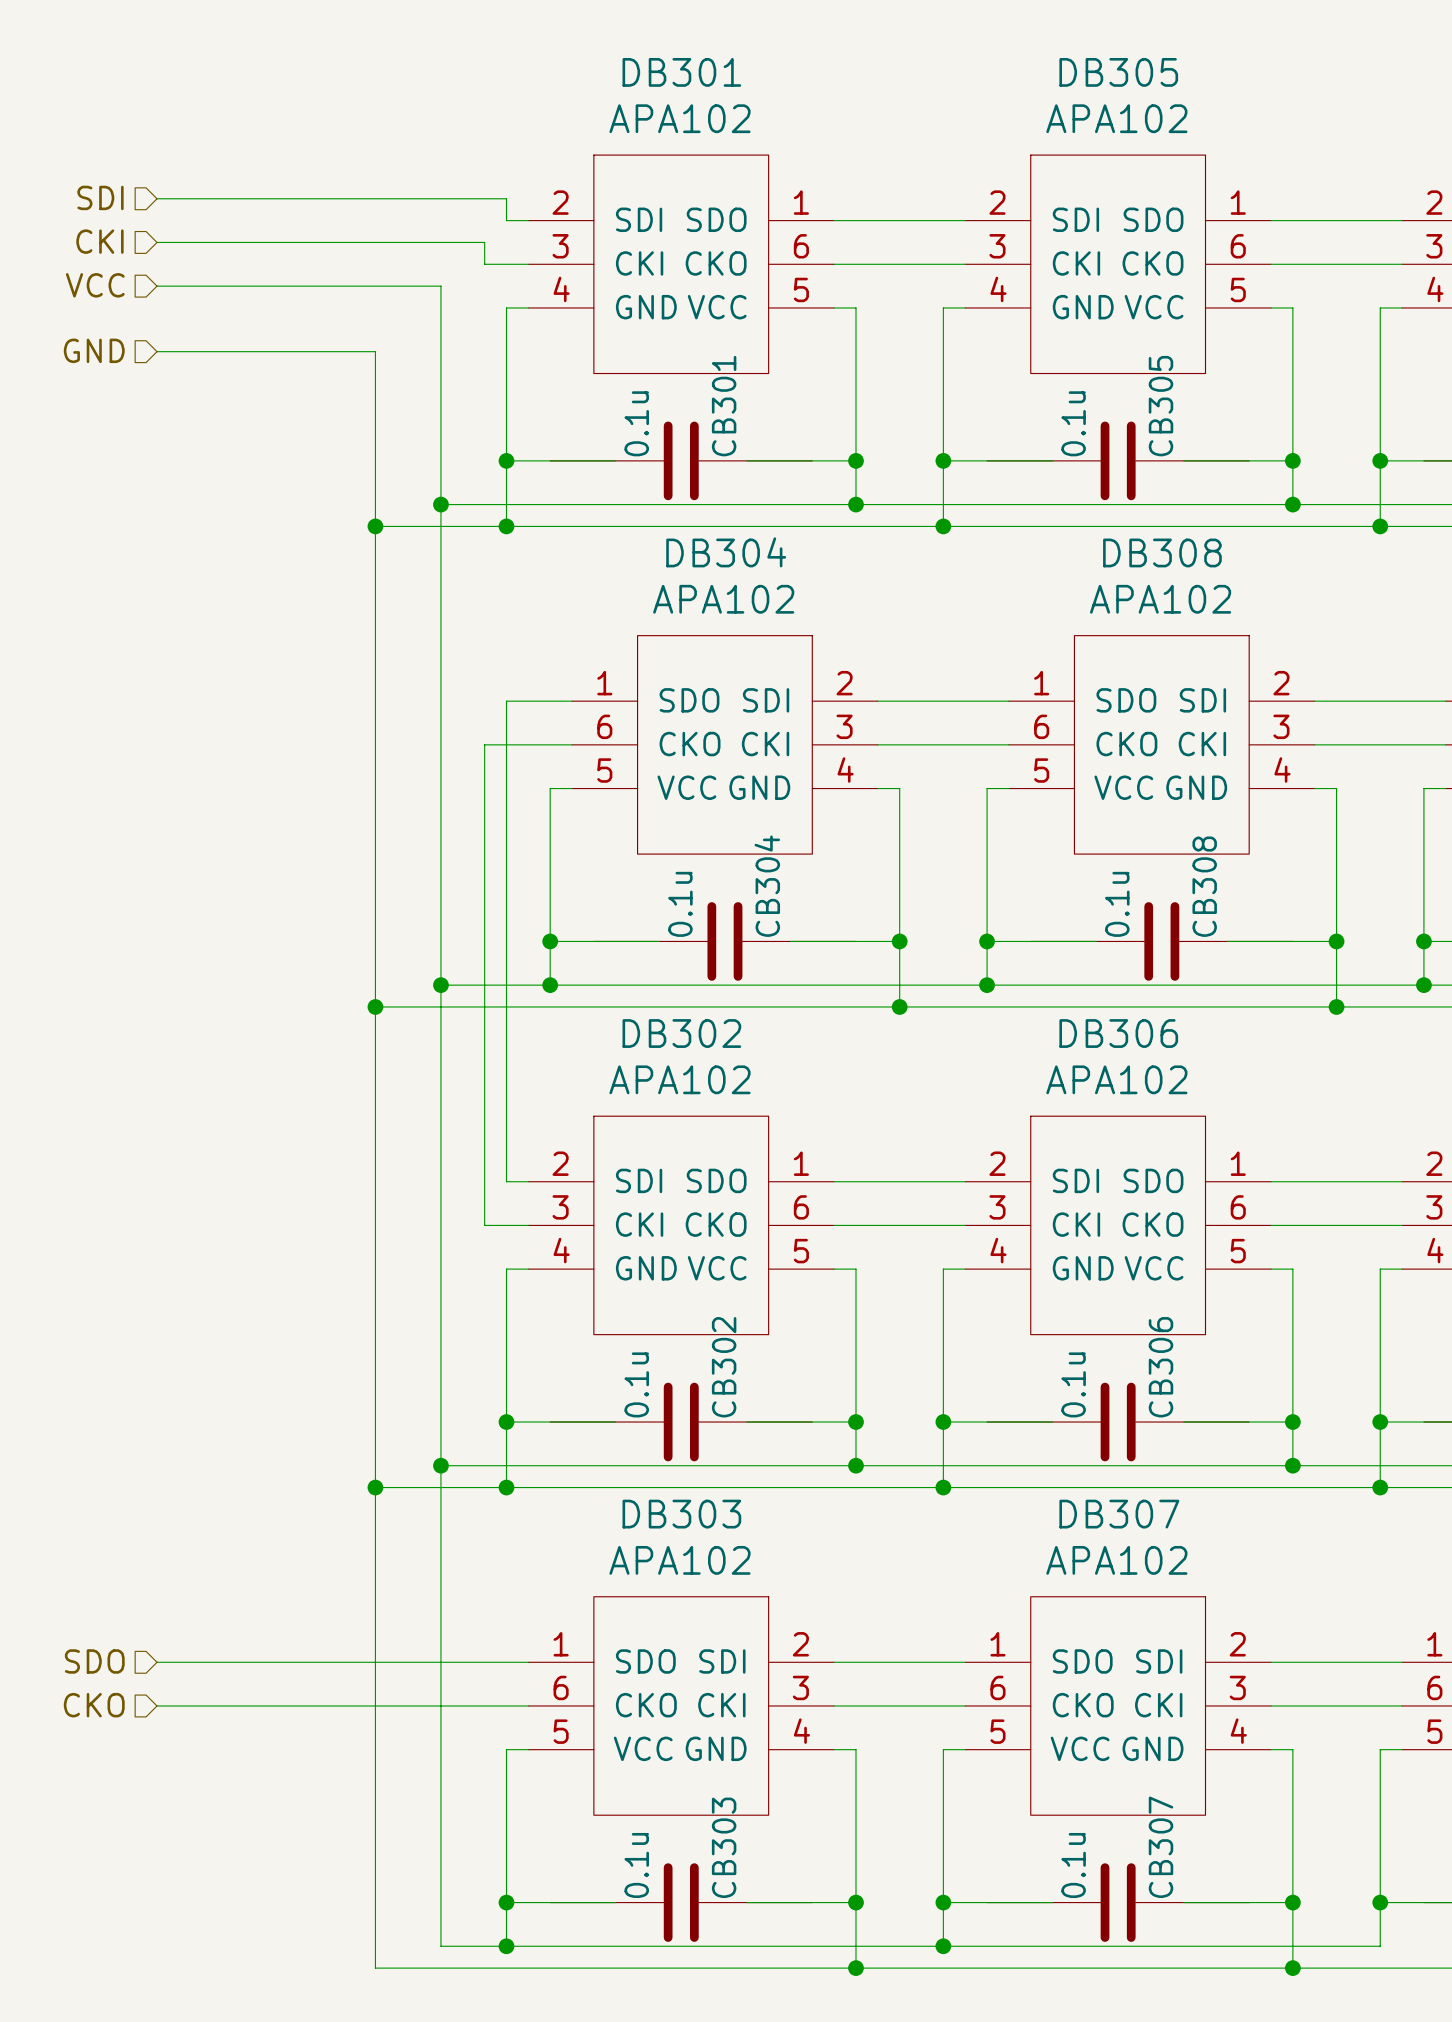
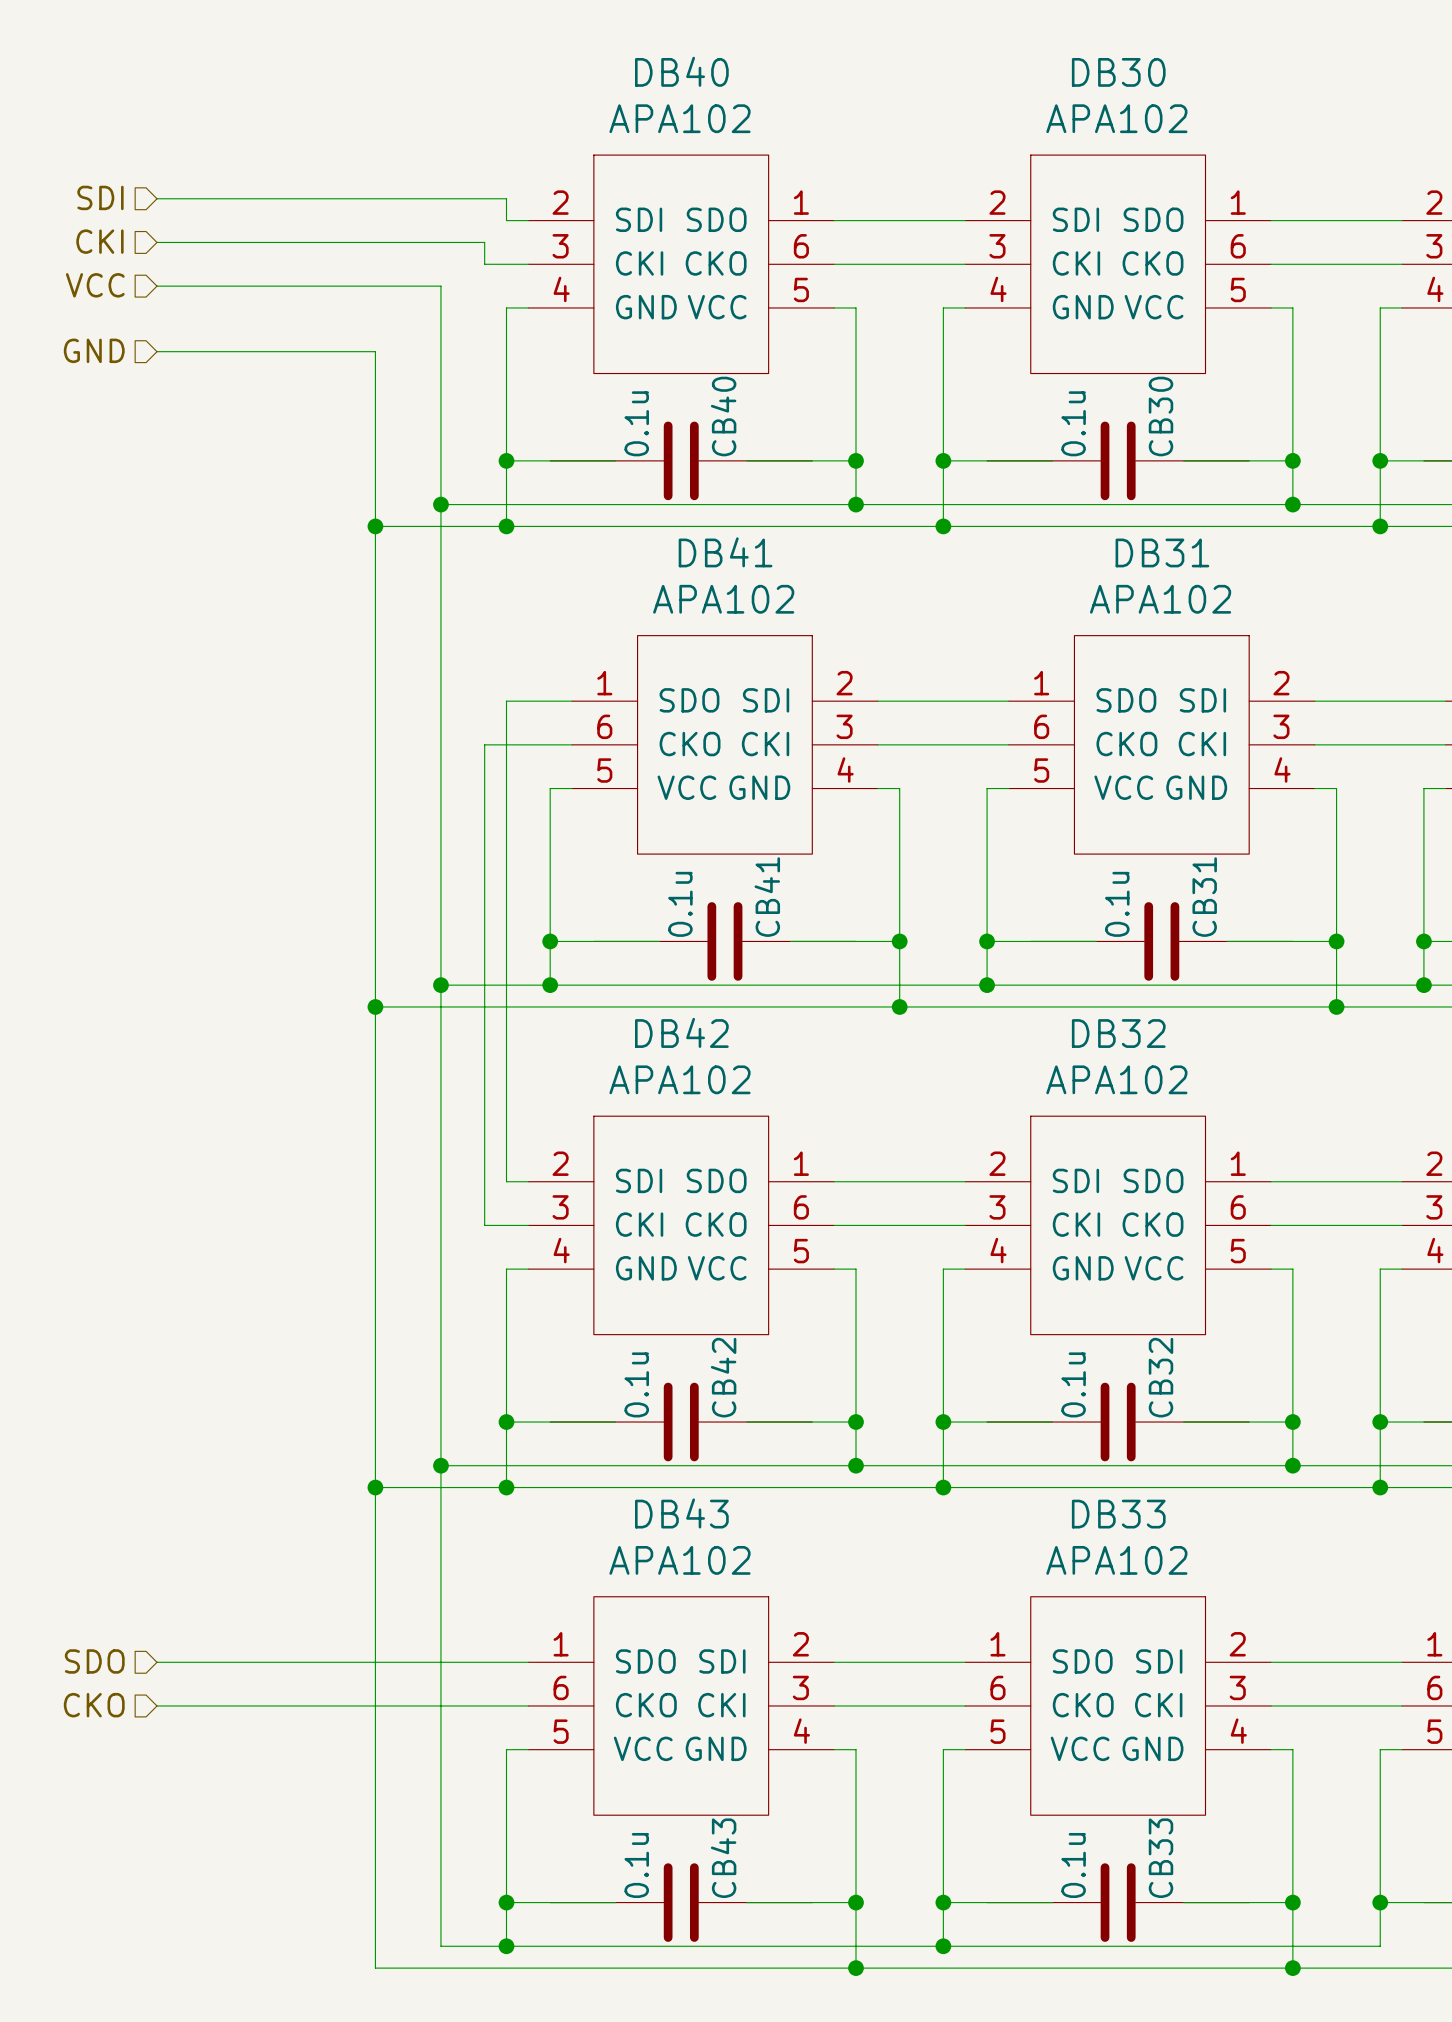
DB301 name: DB301 (681, 72) -> DB40 (681, 71)
DB305 name: DB305 (1118, 72) -> DB30 (1118, 72)
CB301 name: CB301 (724, 406) -> CB40 (723, 416)
CB305 name: CB305 (1160, 406) -> CB30 (1160, 416)
DB304 name: DB304 (726, 552) -> DB41 (725, 552)
DB308 name: DB308 (1162, 552) -> DB31 (1162, 552)
CB304 name: CB304 (767, 886) -> CB41 (767, 897)
CB308 name: CB308 (1204, 886) -> CB31 (1204, 897)
DB302 name: DB302 (681, 1033) -> DB42 (681, 1032)
DB306 name: DB306 (1118, 1033) -> DB32 (1118, 1033)
CB302 name: CB302 (724, 1367) -> CB42 (723, 1377)
CB306 name: CB306 (1160, 1367) -> CB32 (1160, 1377)
DB303 name: DB303 (681, 1514) -> DB43 (681, 1513)
DB307 name: DB307 (1119, 1514) -> DB33 (1118, 1514)
CB303 name: CB303 (724, 1847) -> CB43 (723, 1858)
CB307 name: CB307 (1160, 1847) -> CB33 (1160, 1858)

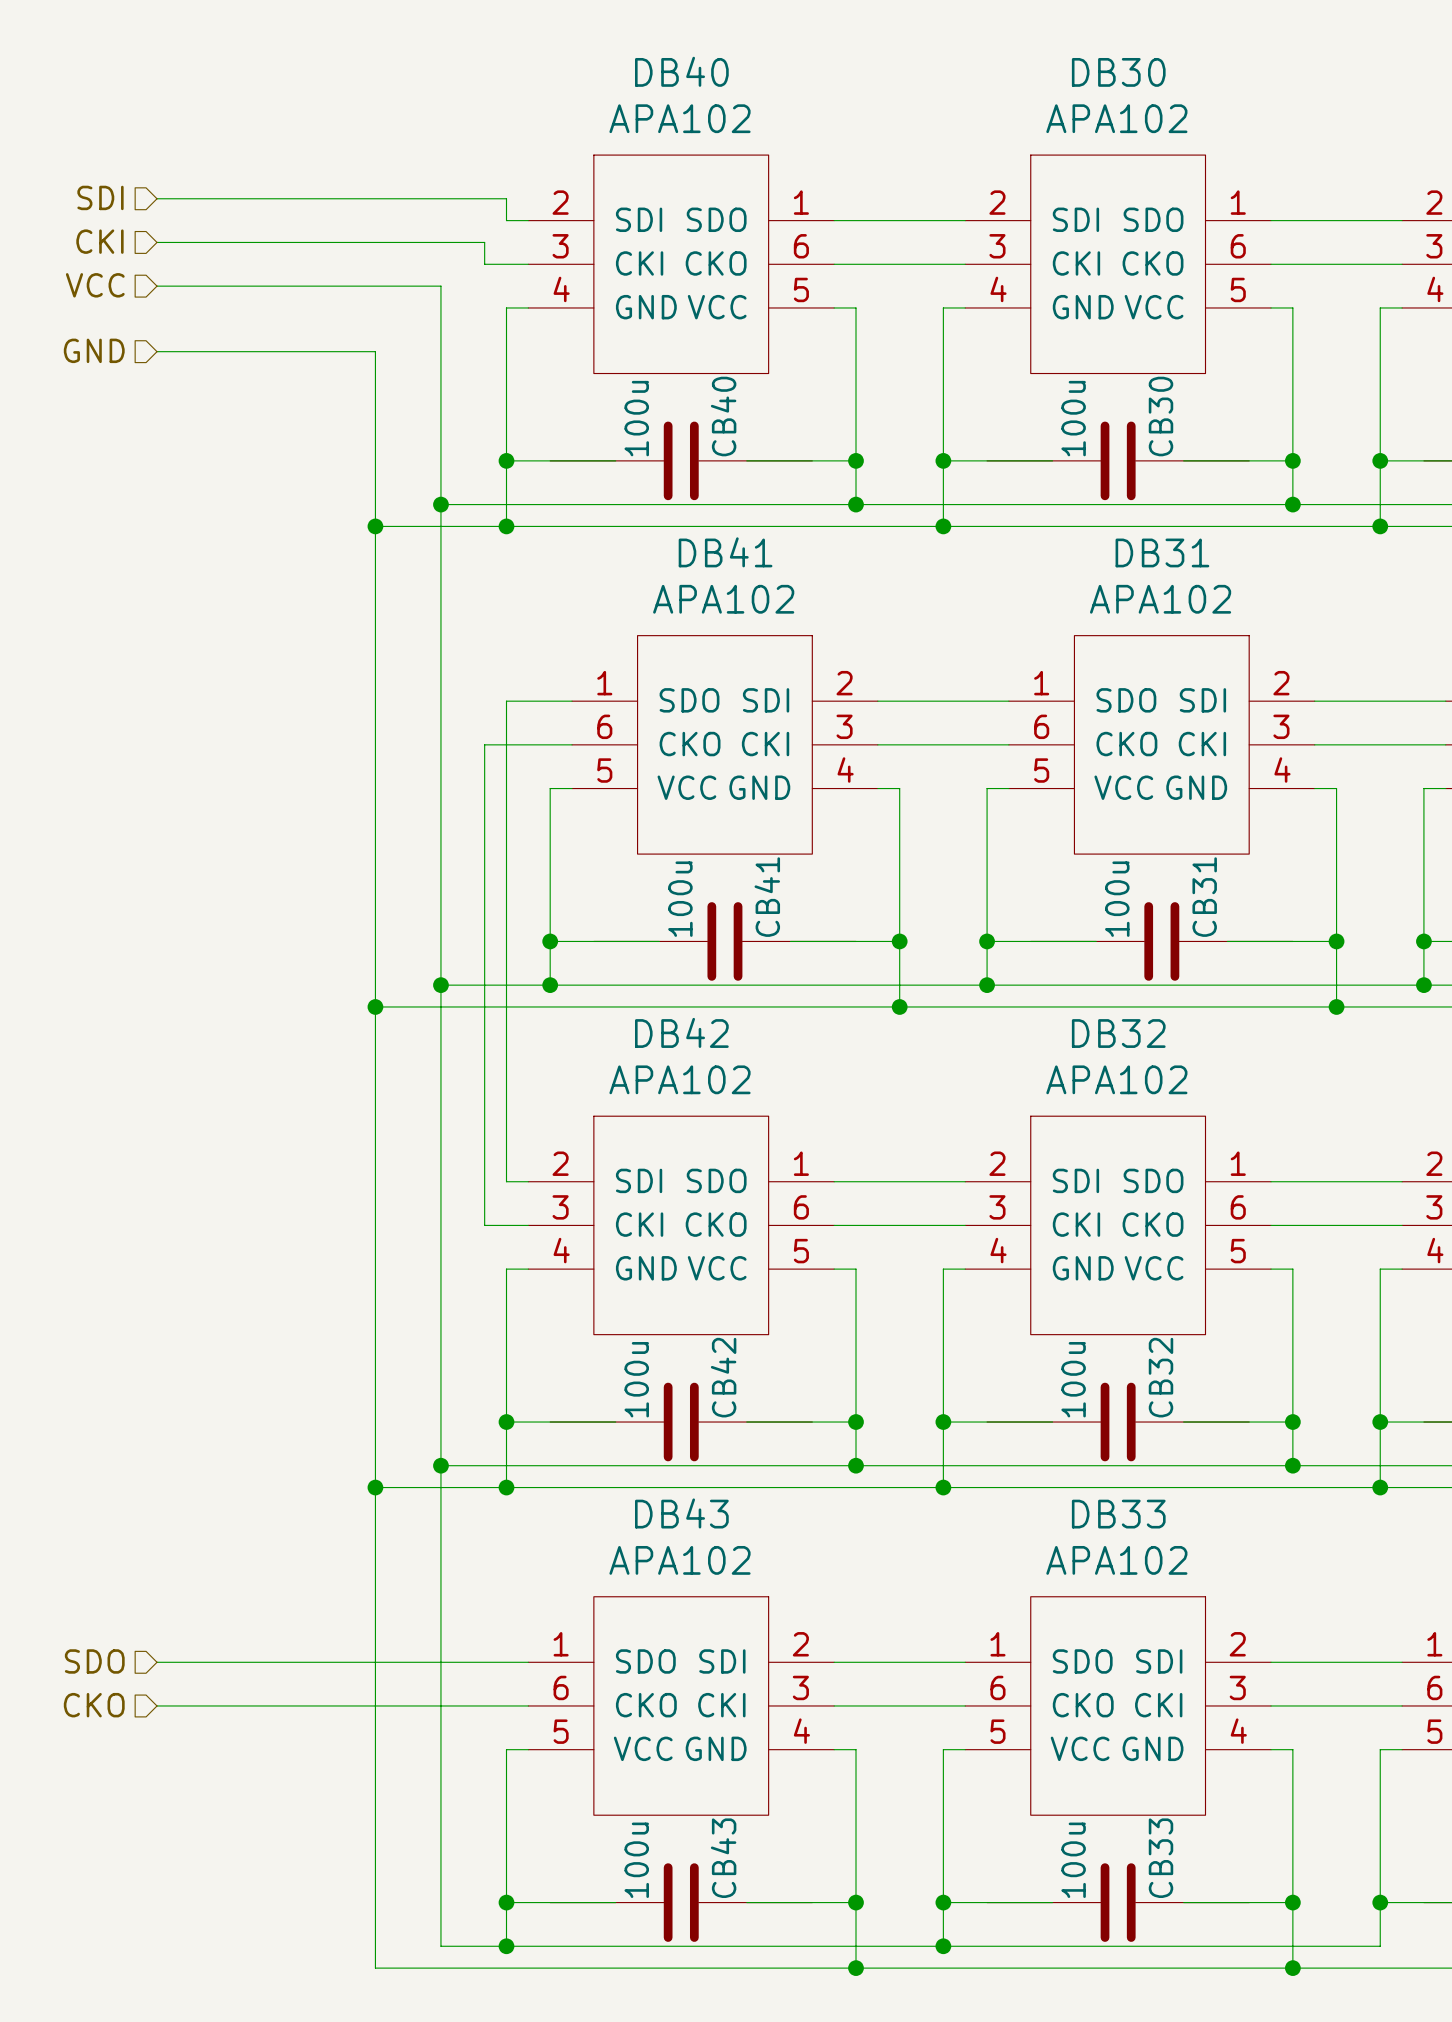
CB40 value: 0.1u (636, 423) -> 100u (636, 418)
CB30 value: 0.1u (1073, 423) -> 100u (1073, 418)
CB41 value: 0.1u (680, 904) -> 100u (680, 899)
CB31 value: 0.1u (1117, 904) -> 100u (1117, 899)
CB42 value: 0.1u (636, 1384) -> 100u (636, 1379)
CB32 value: 0.1u (1073, 1384) -> 100u (1073, 1379)
CB43 value: 0.1u (636, 1865) -> 100u (636, 1860)
CB33 value: 0.1u (1073, 1865) -> 100u (1073, 1860)

